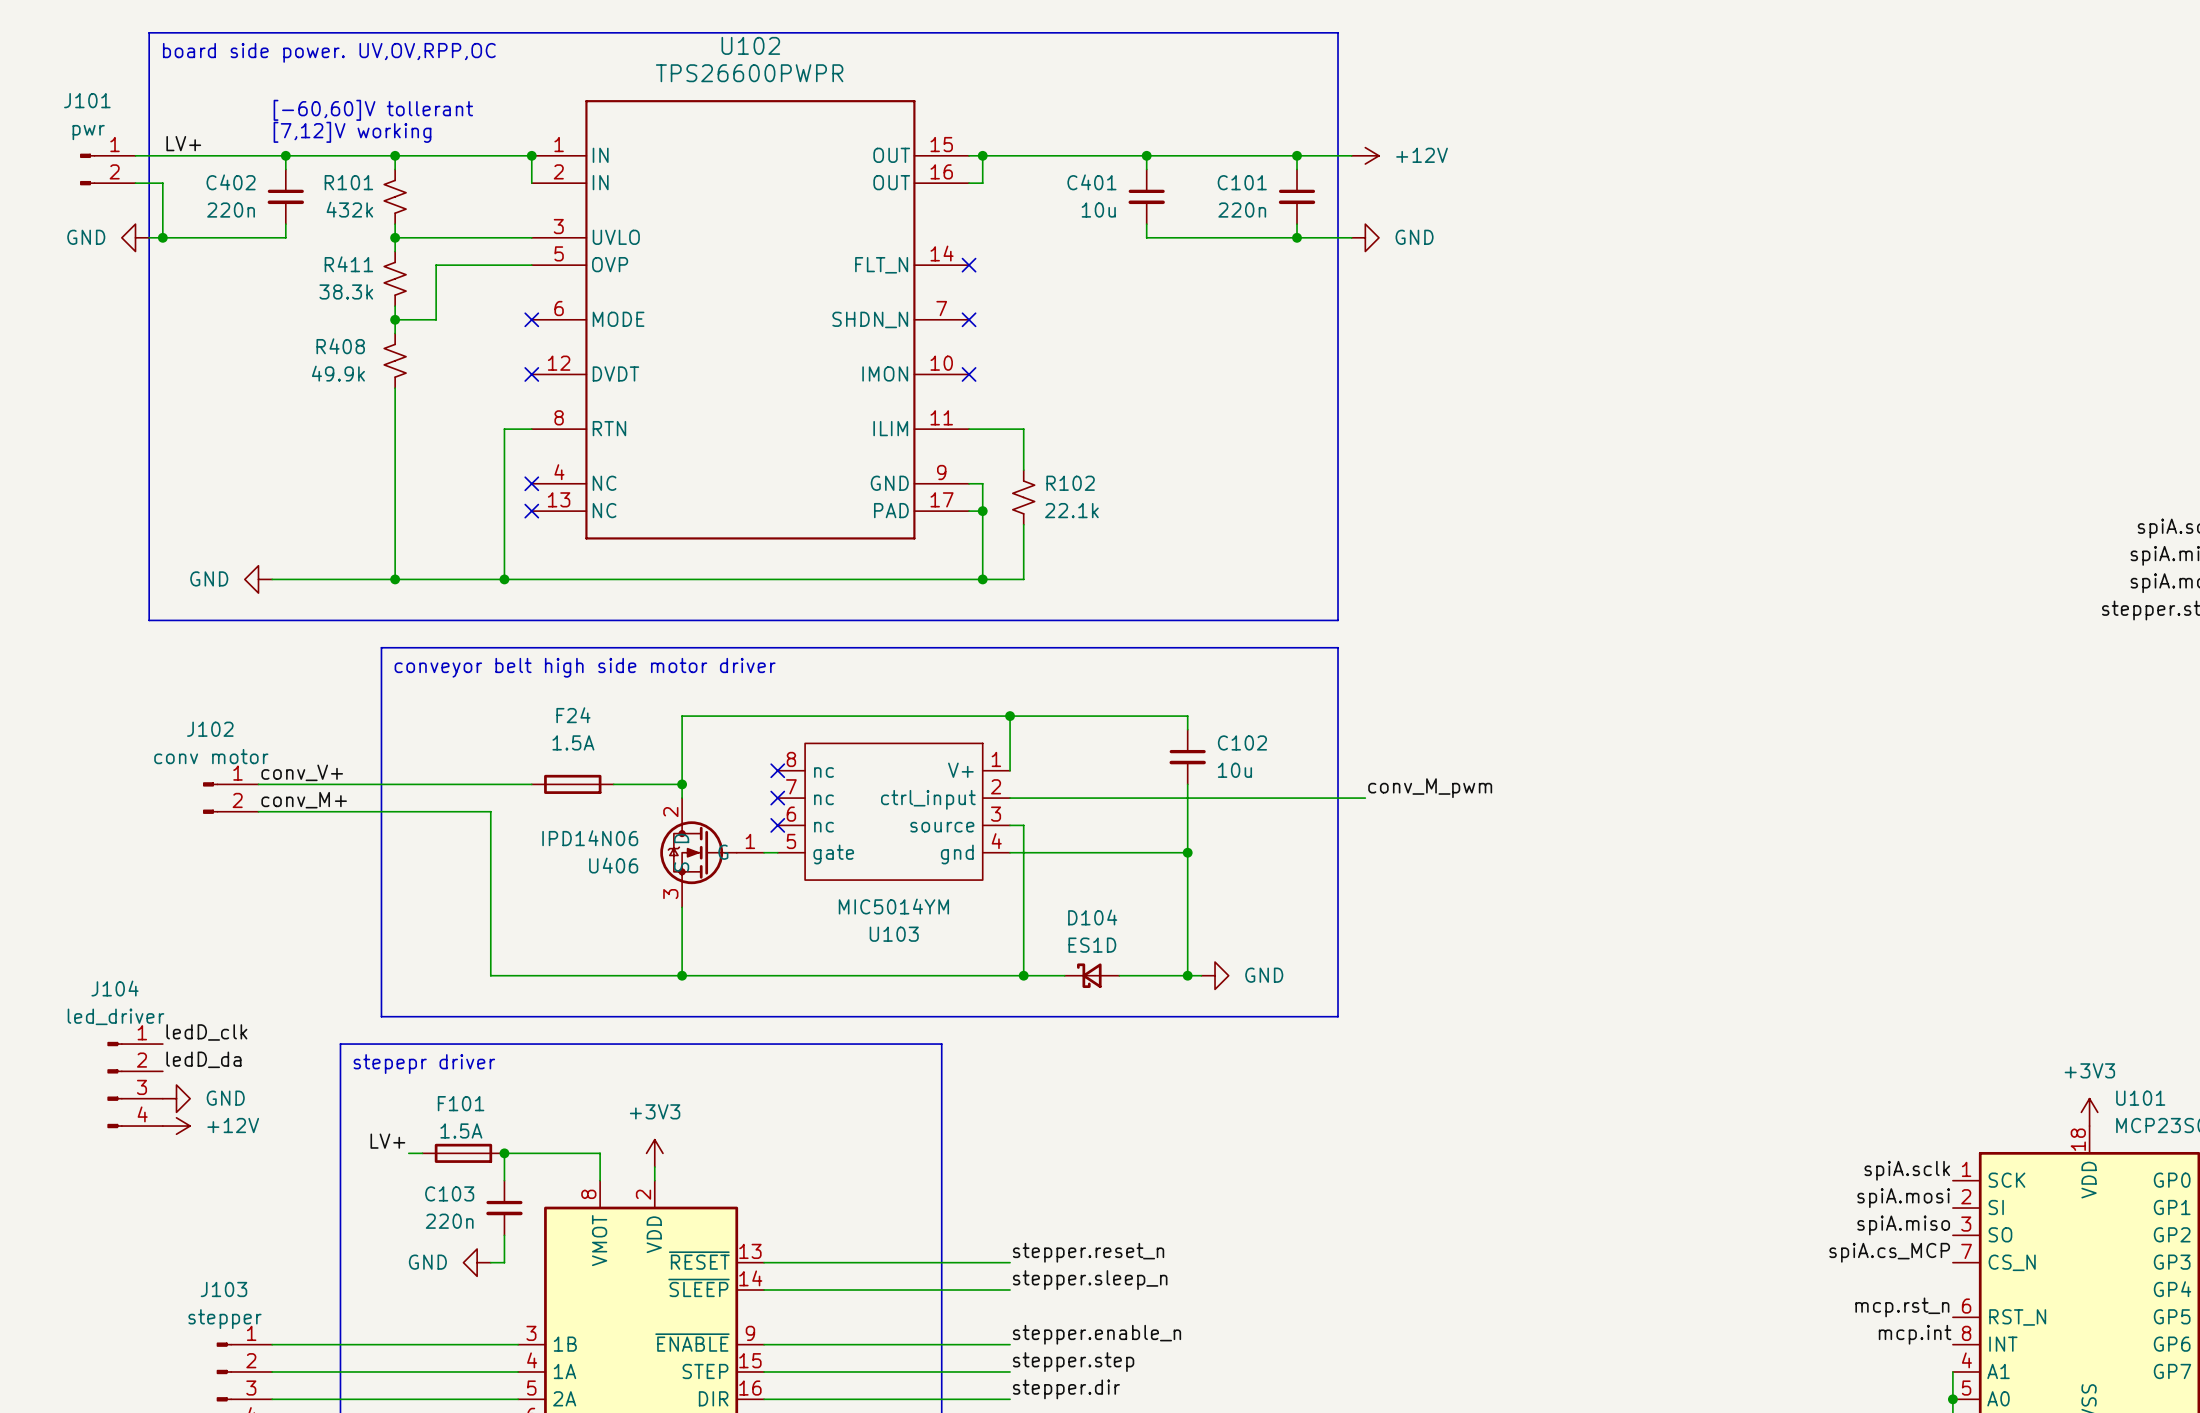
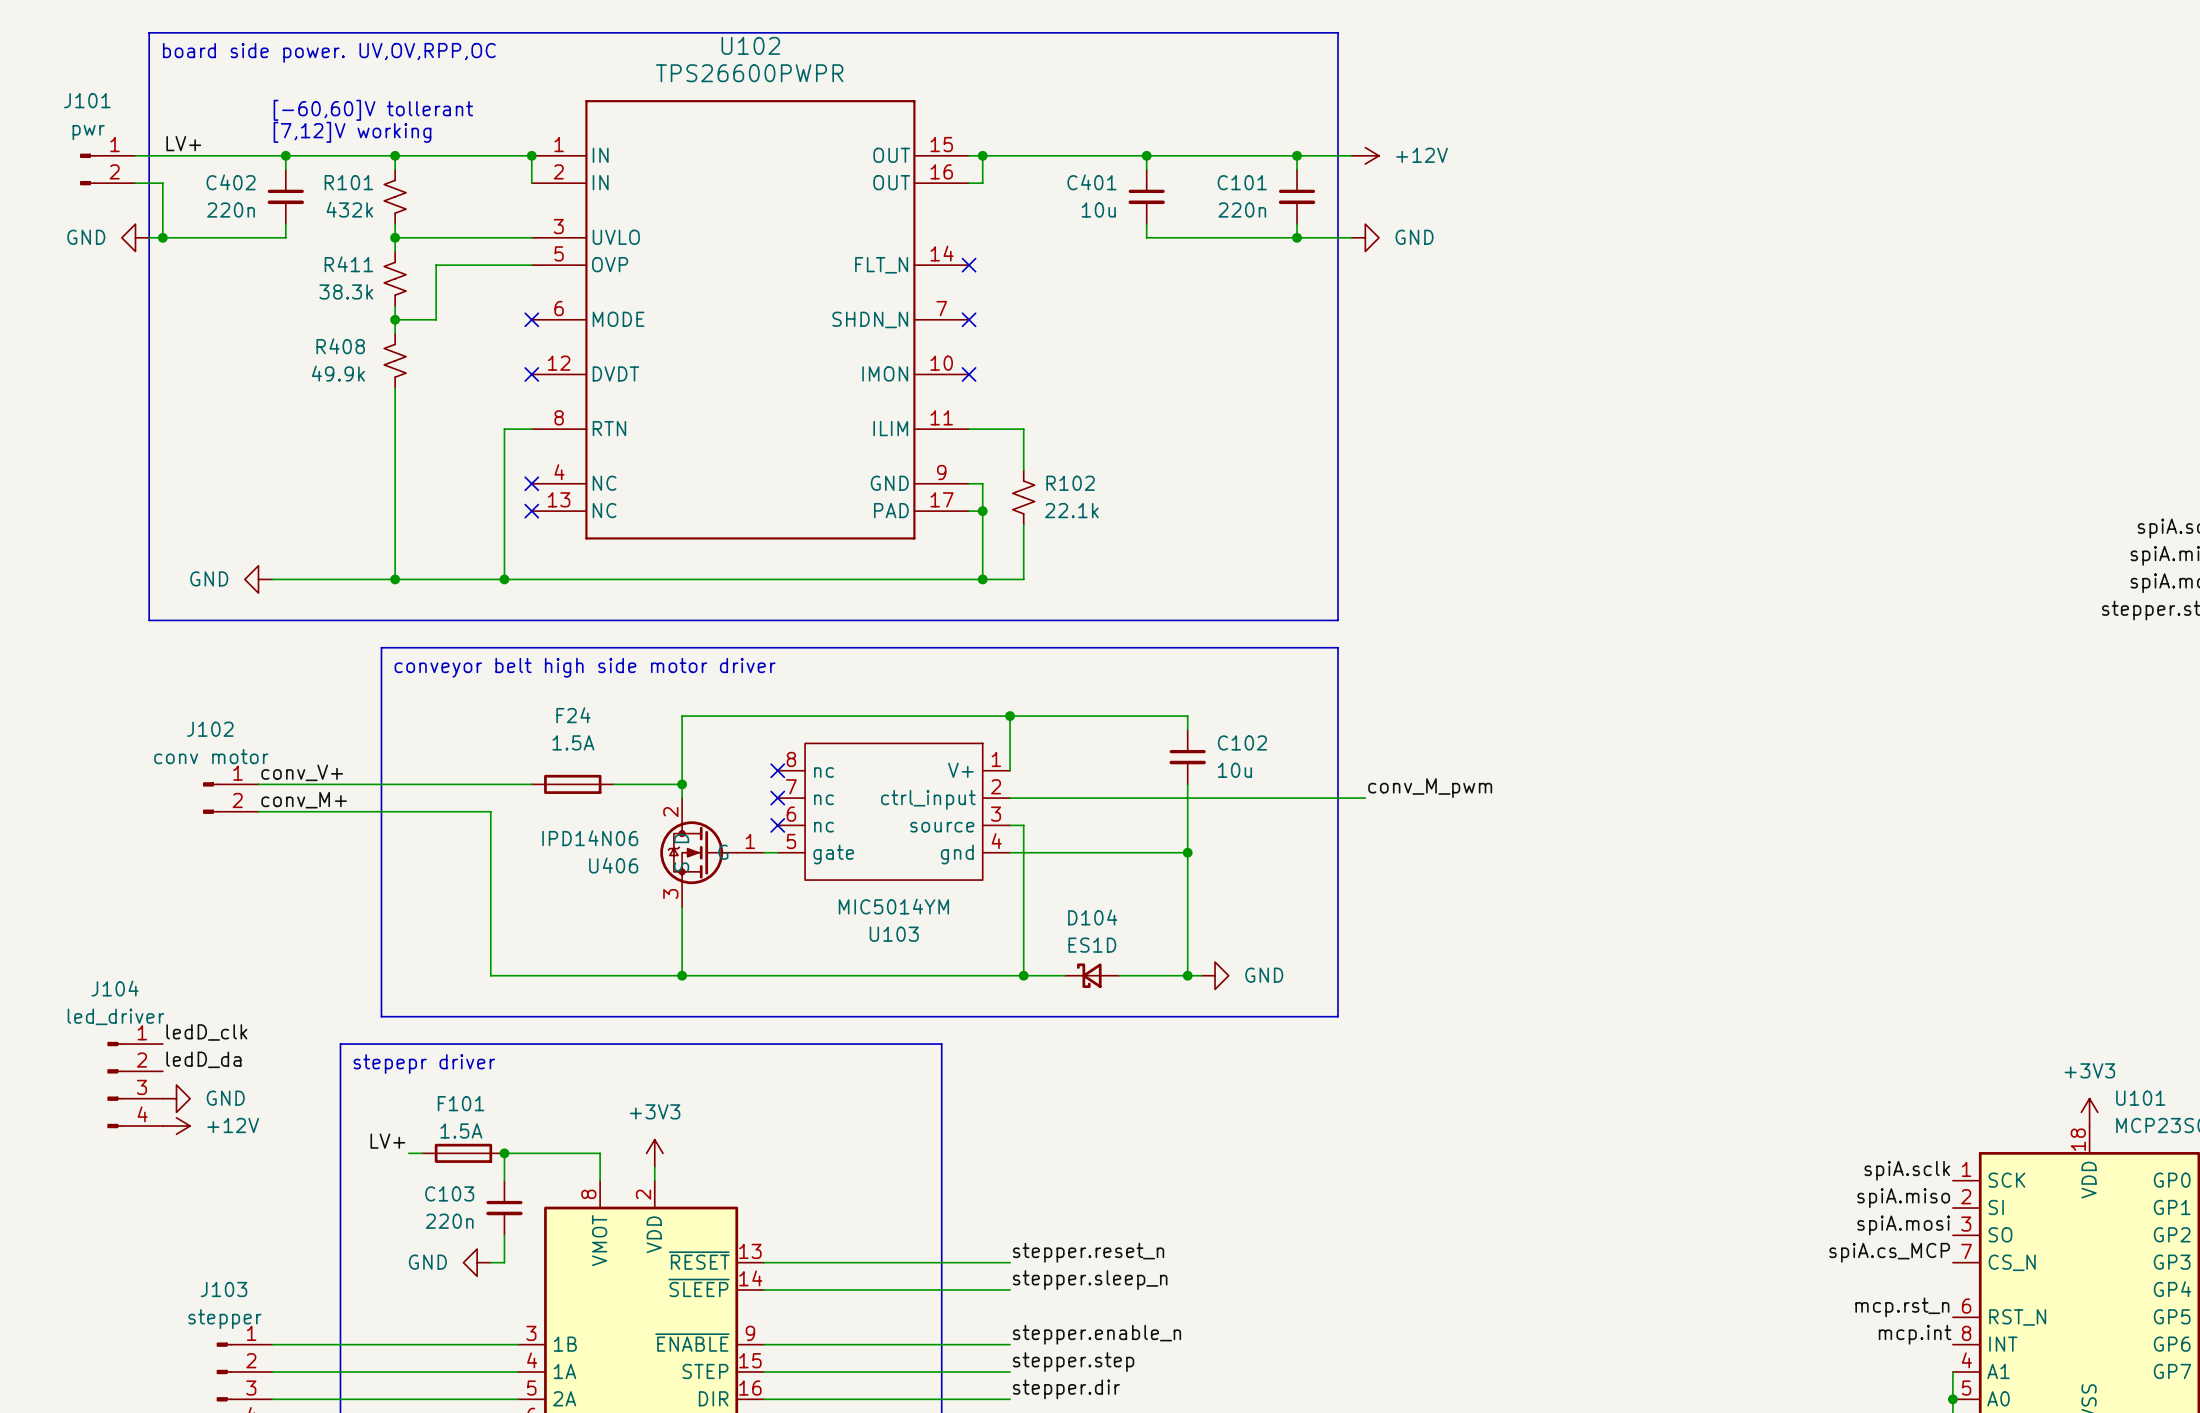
label: spiA.mosi (1903, 1198) -> spiA.miso (1903, 1198)
label: spiA.miso (1903, 1225) -> spiA.mosi (1903, 1225)

